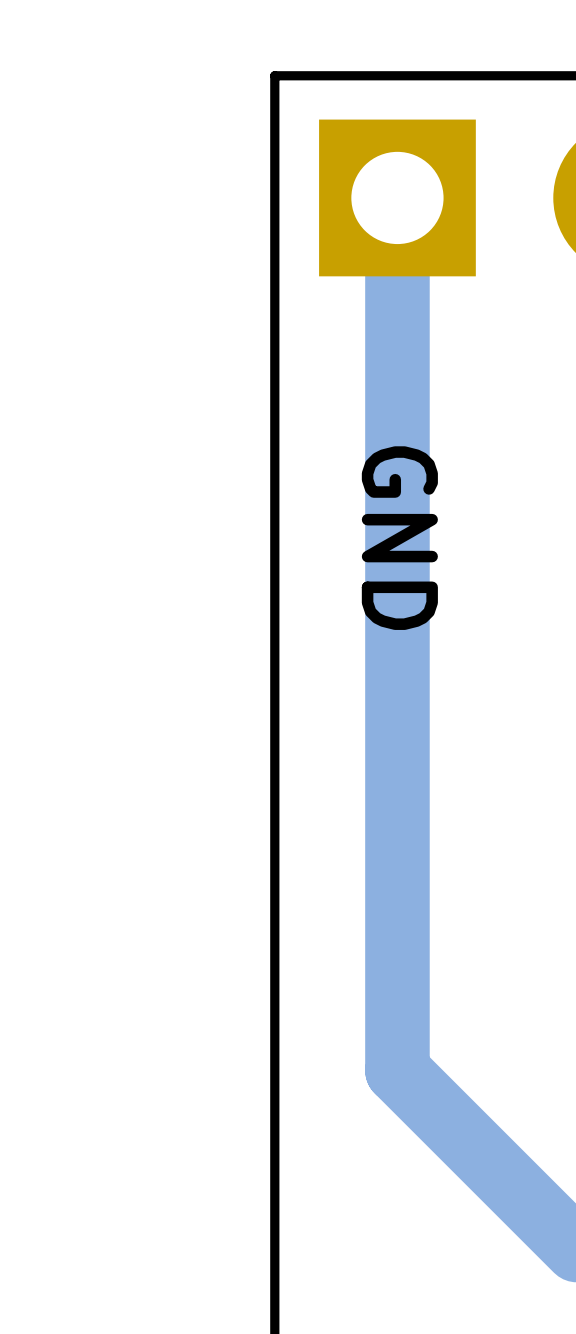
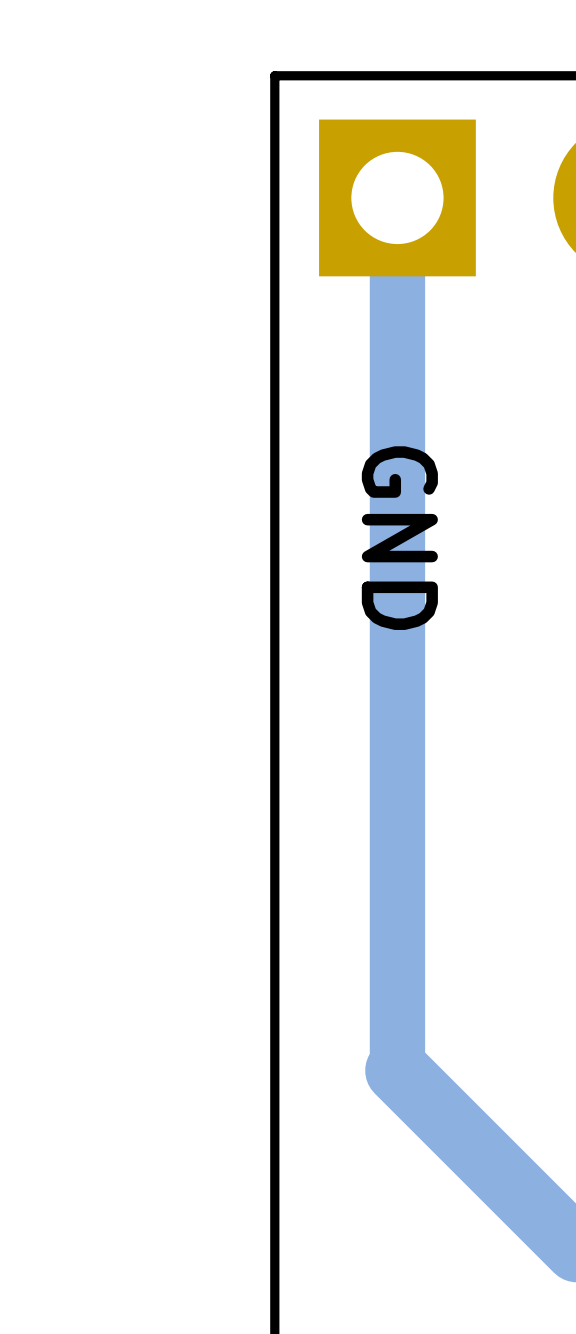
track width: thick (397, 197) (397, 1070) -> thin (397, 197) (397, 1070)

